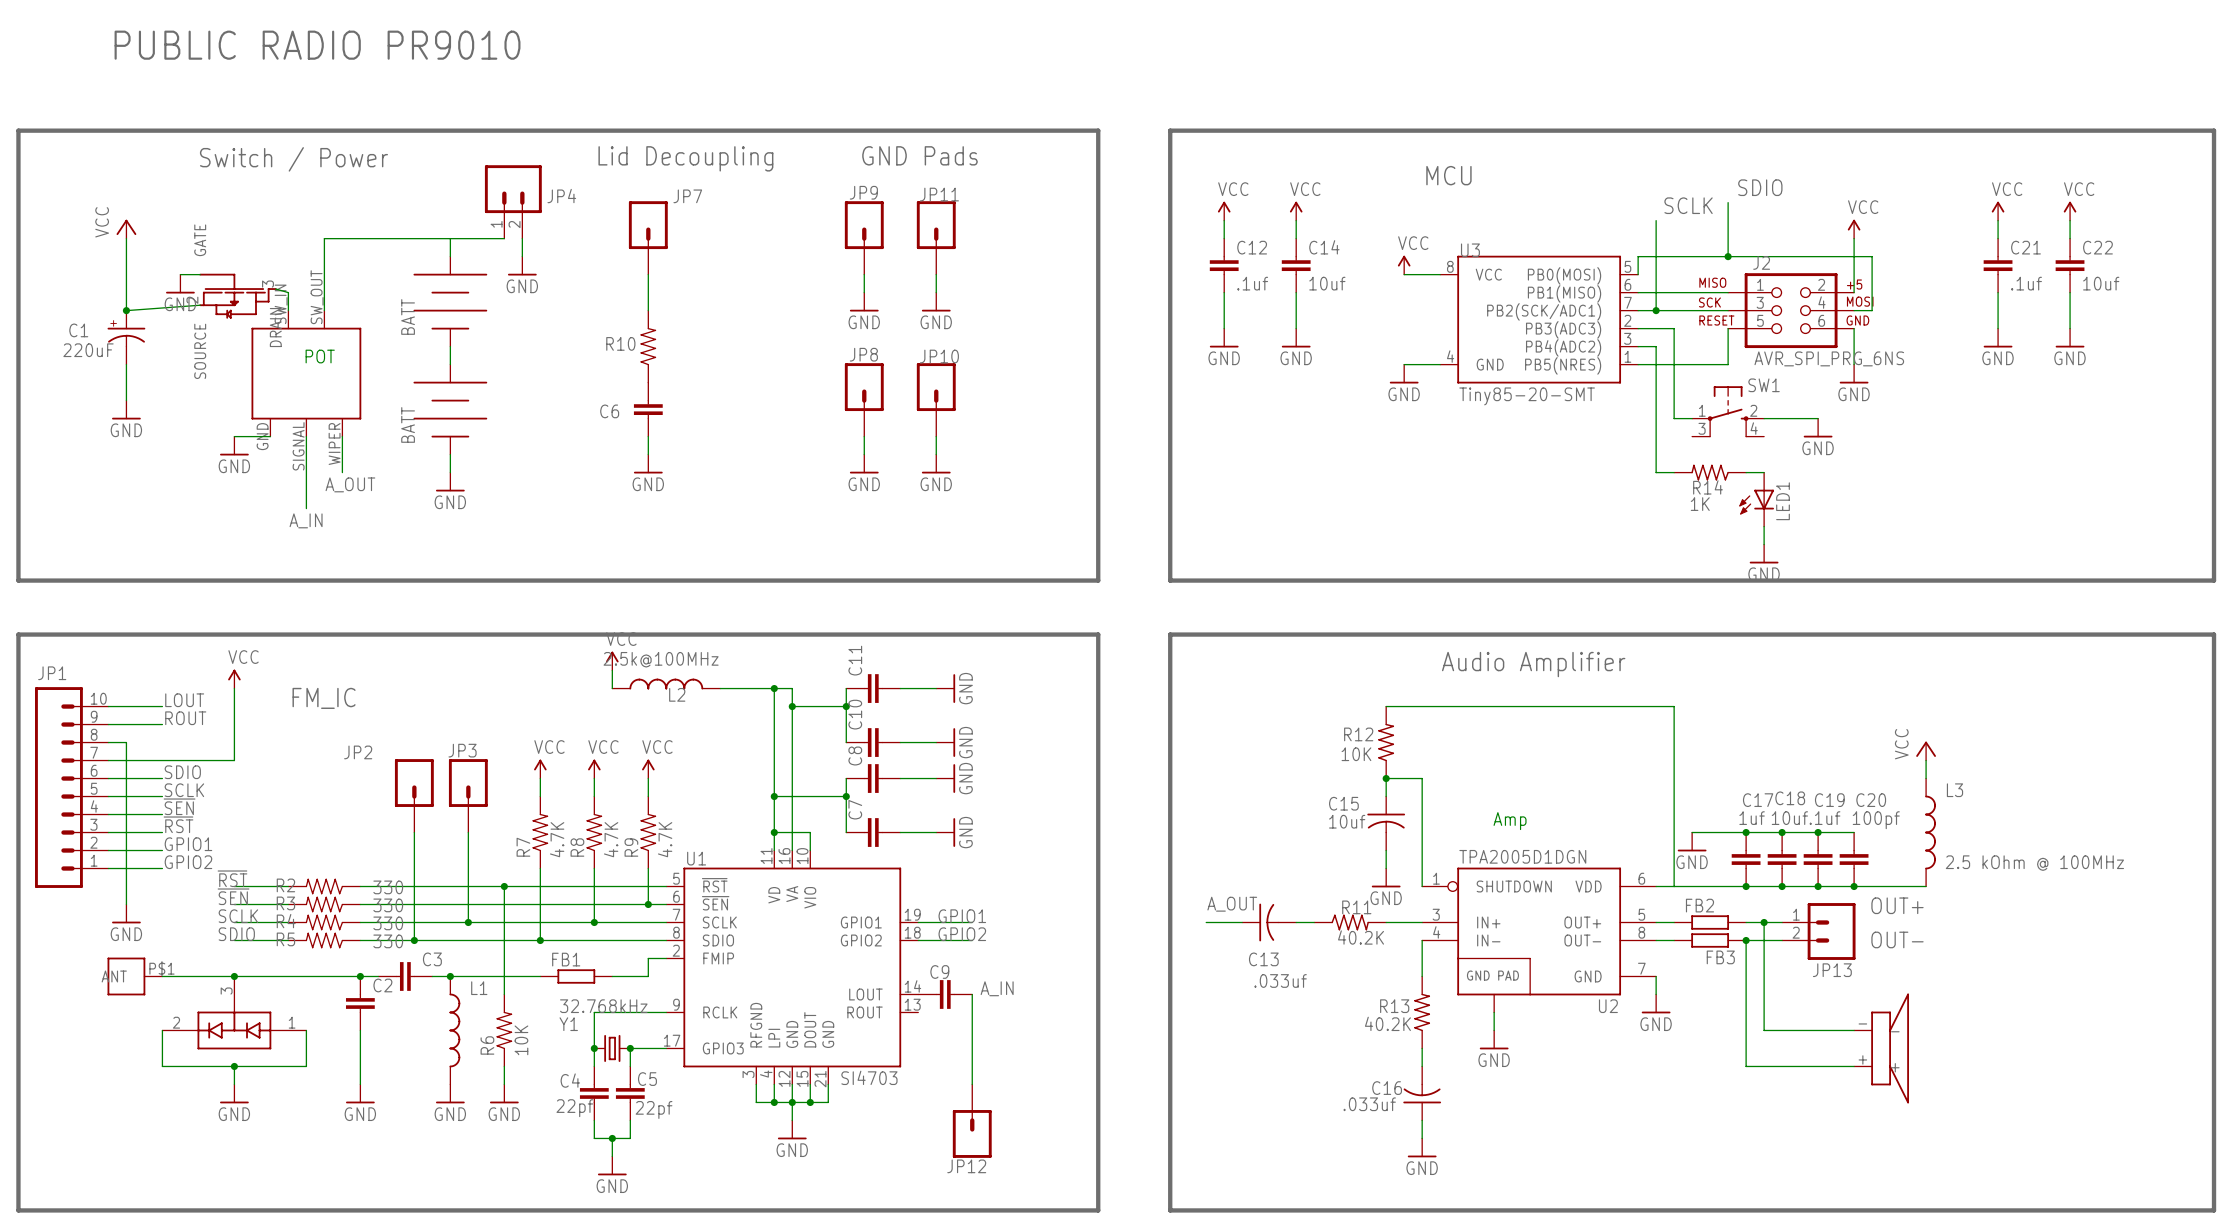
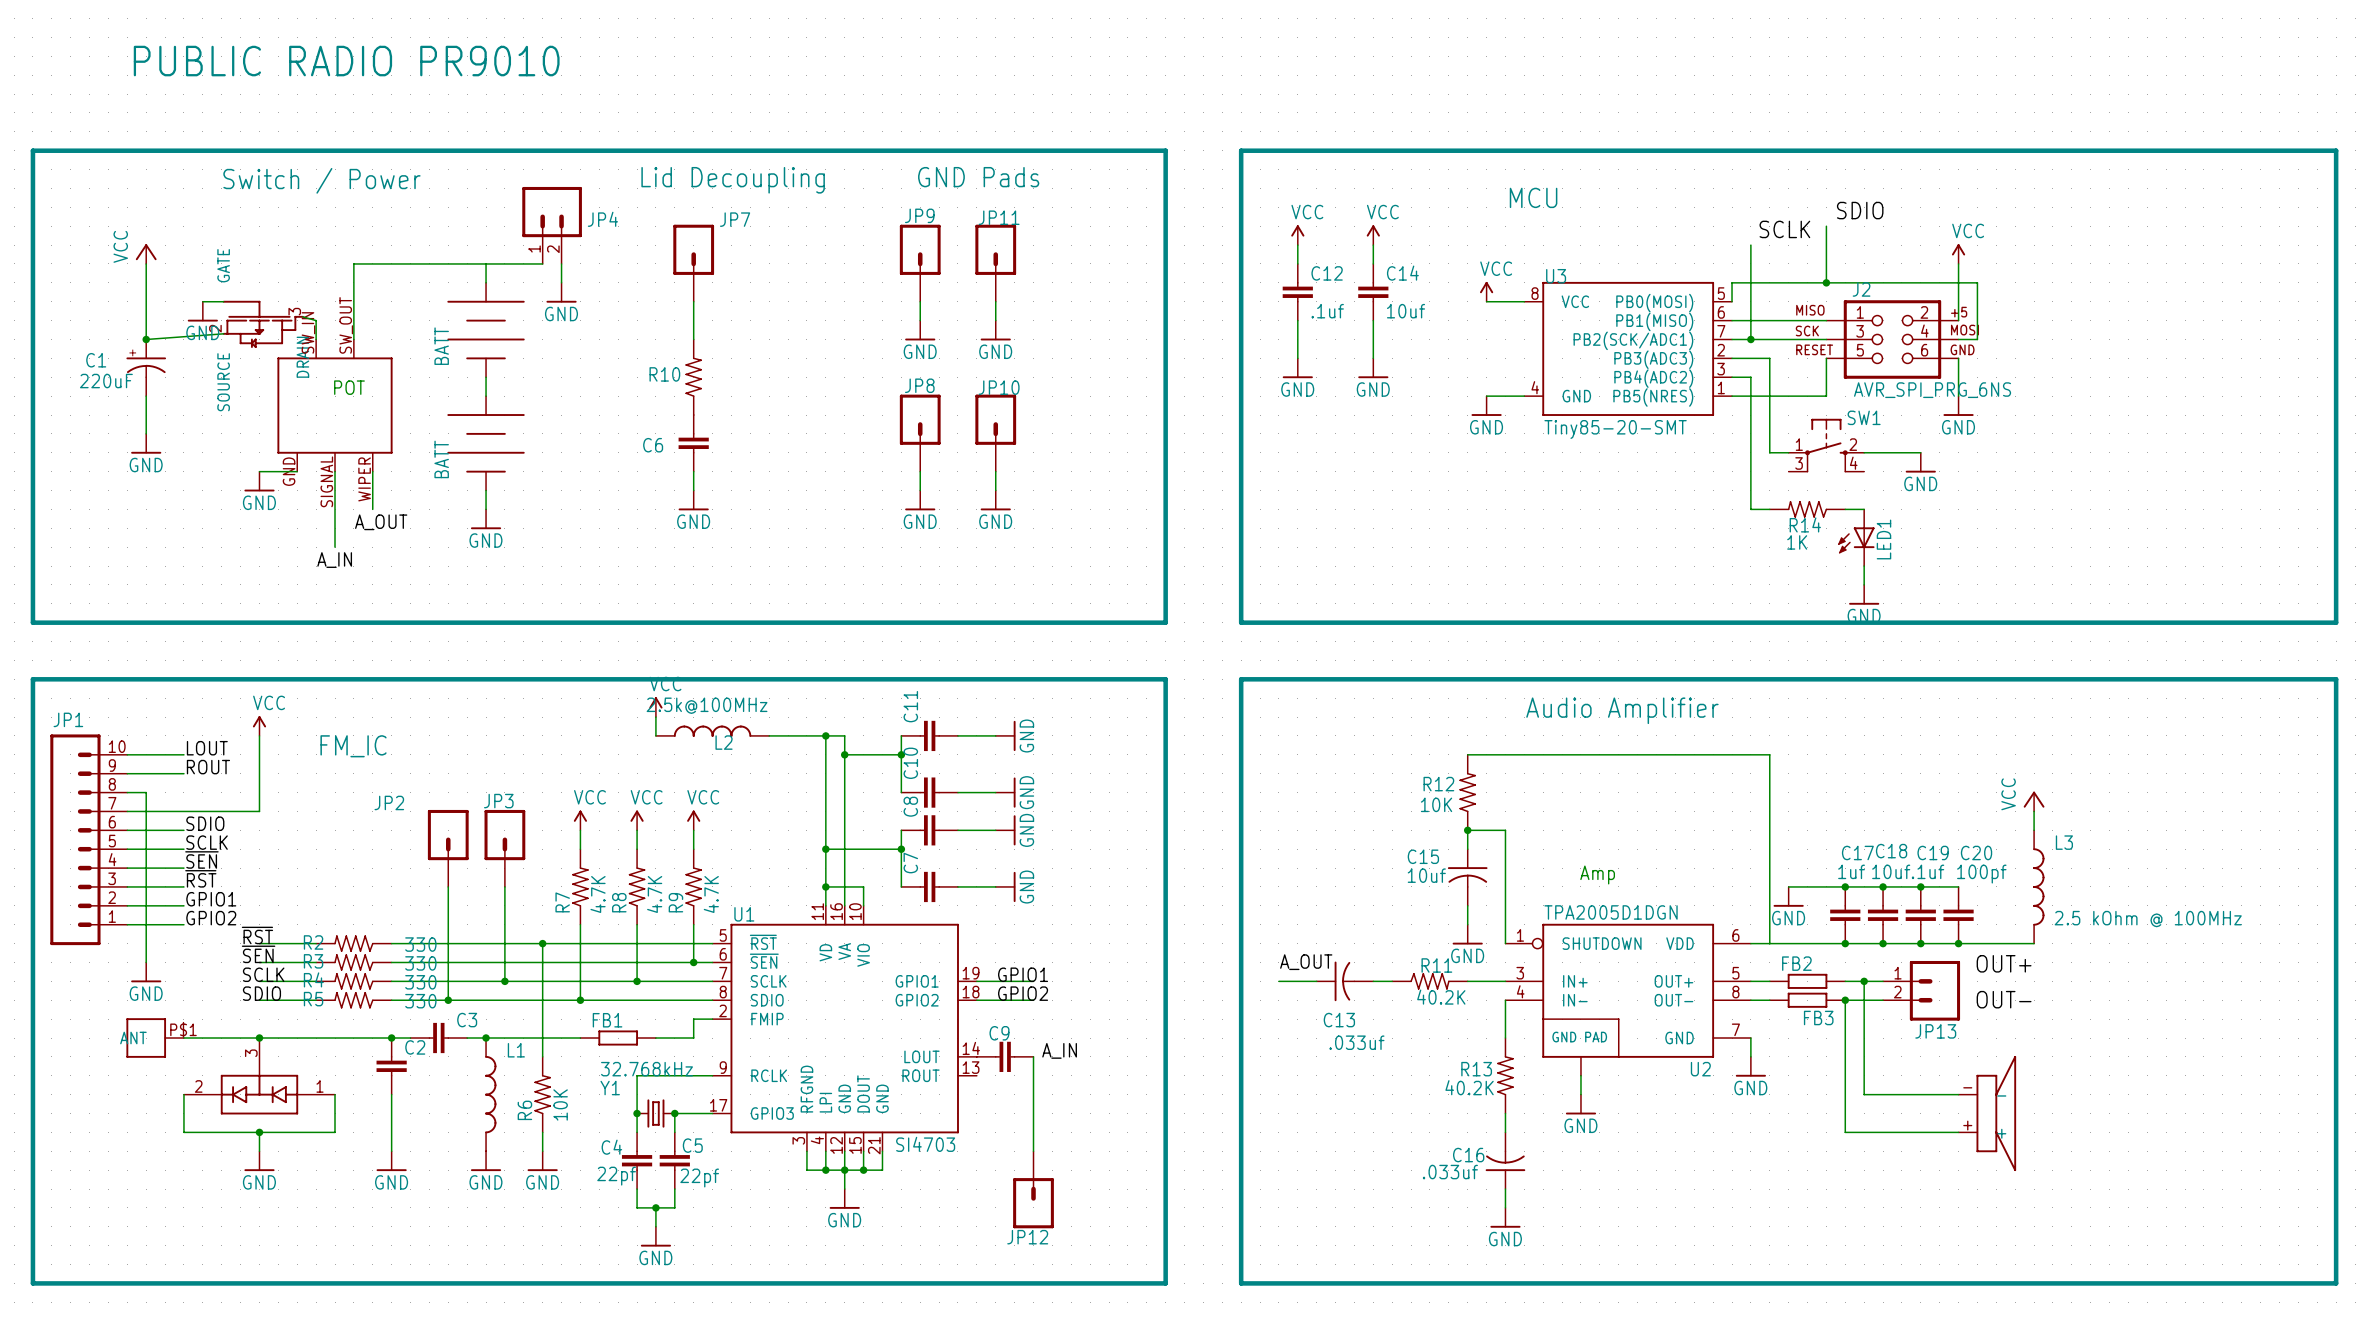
power symbol: VCC (1998, 211) -> none
power symbol: VCC (2070, 211) -> none
wire: (1998, 220) (1998, 238) -> none
wire: (2070, 220) (2070, 238) -> none
C21: .1uf (1998, 265) -> none
C22: 10uf (2070, 265) -> none
wire: (1998, 292) (1998, 328) -> none
wire: (2070, 292) (2070, 328) -> none
power symbol: GND (1998, 338) -> none
power symbol: GND (2070, 338) -> none

